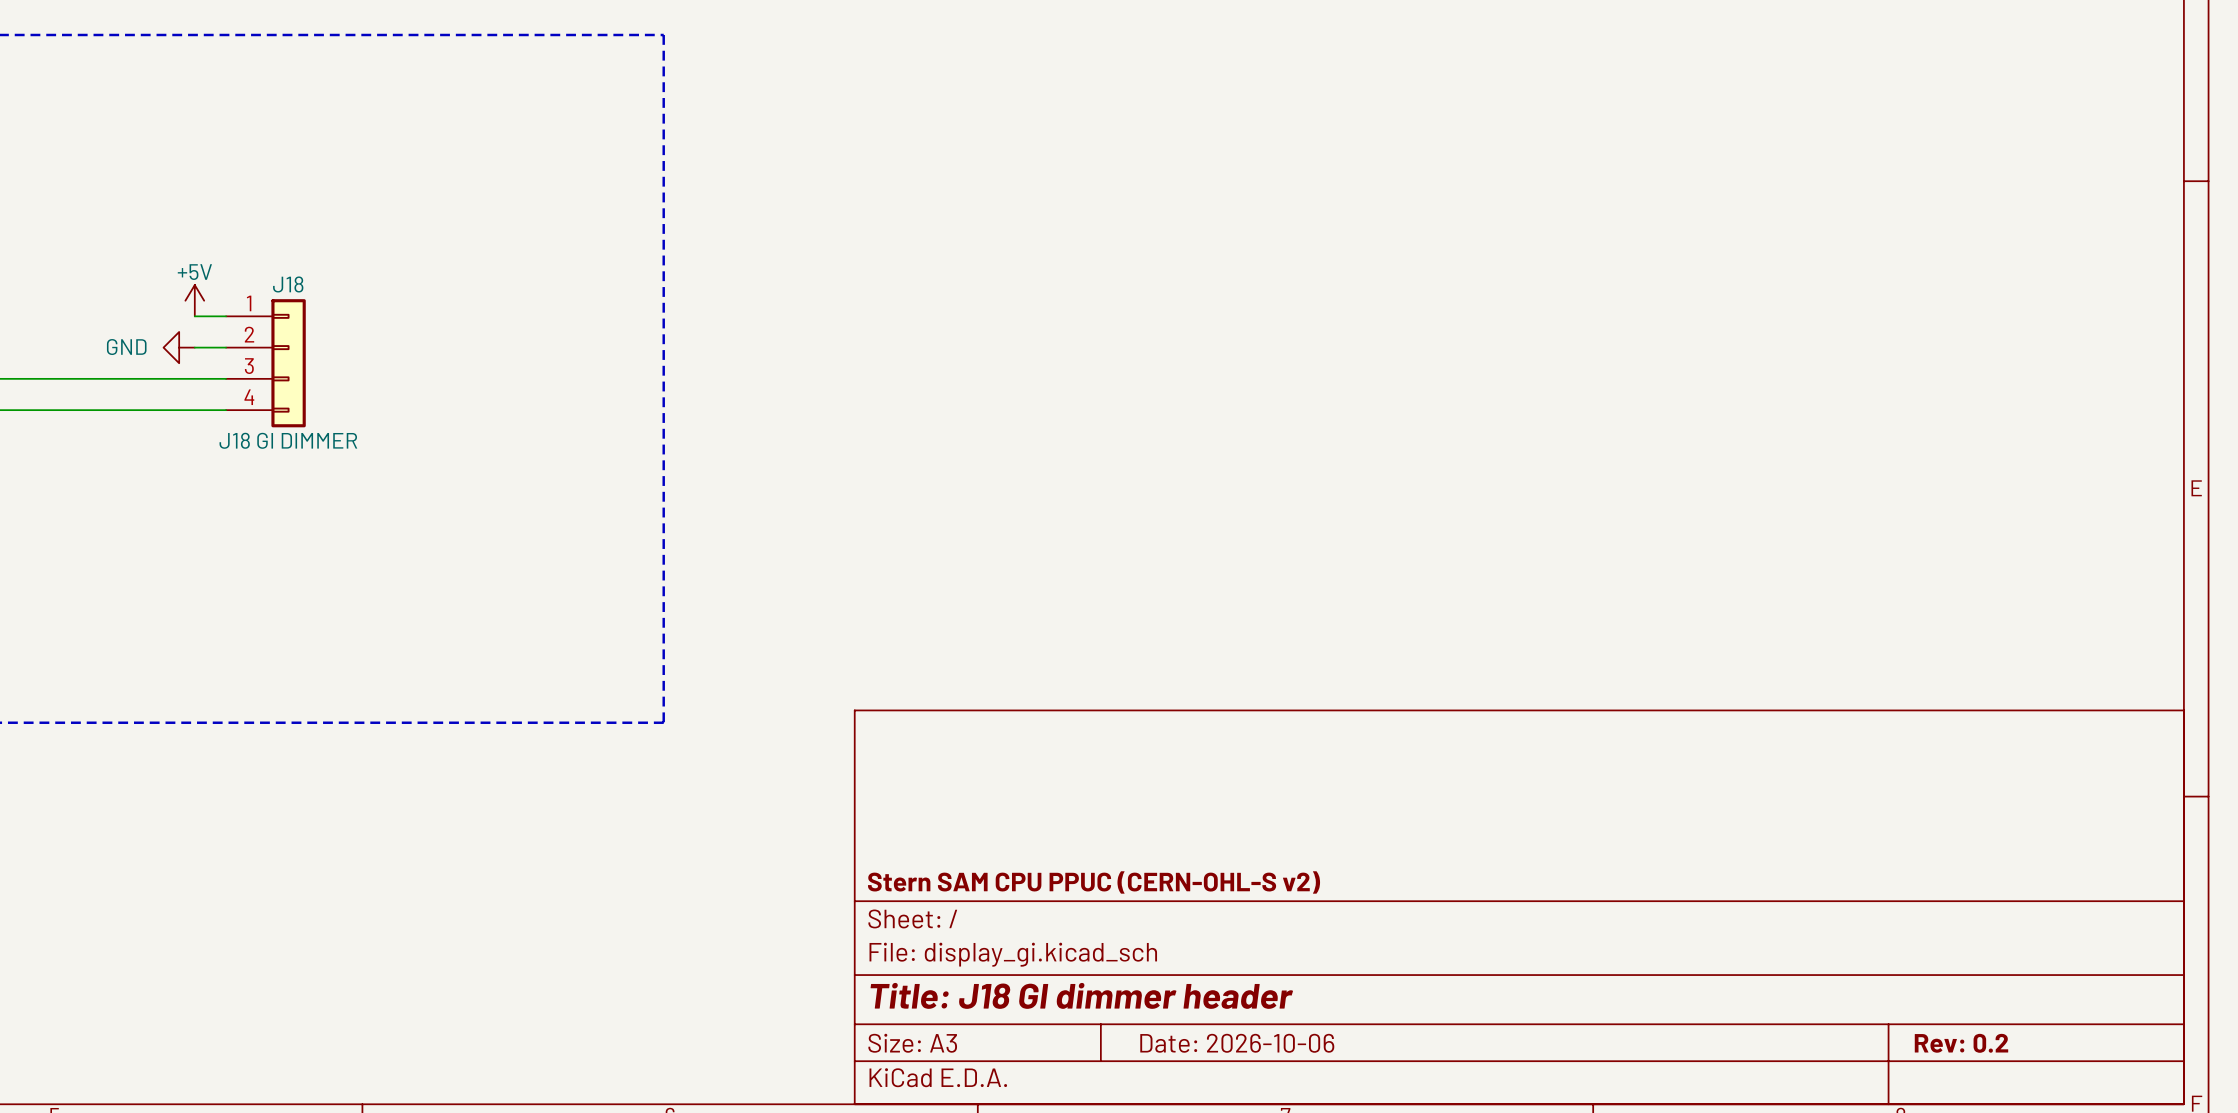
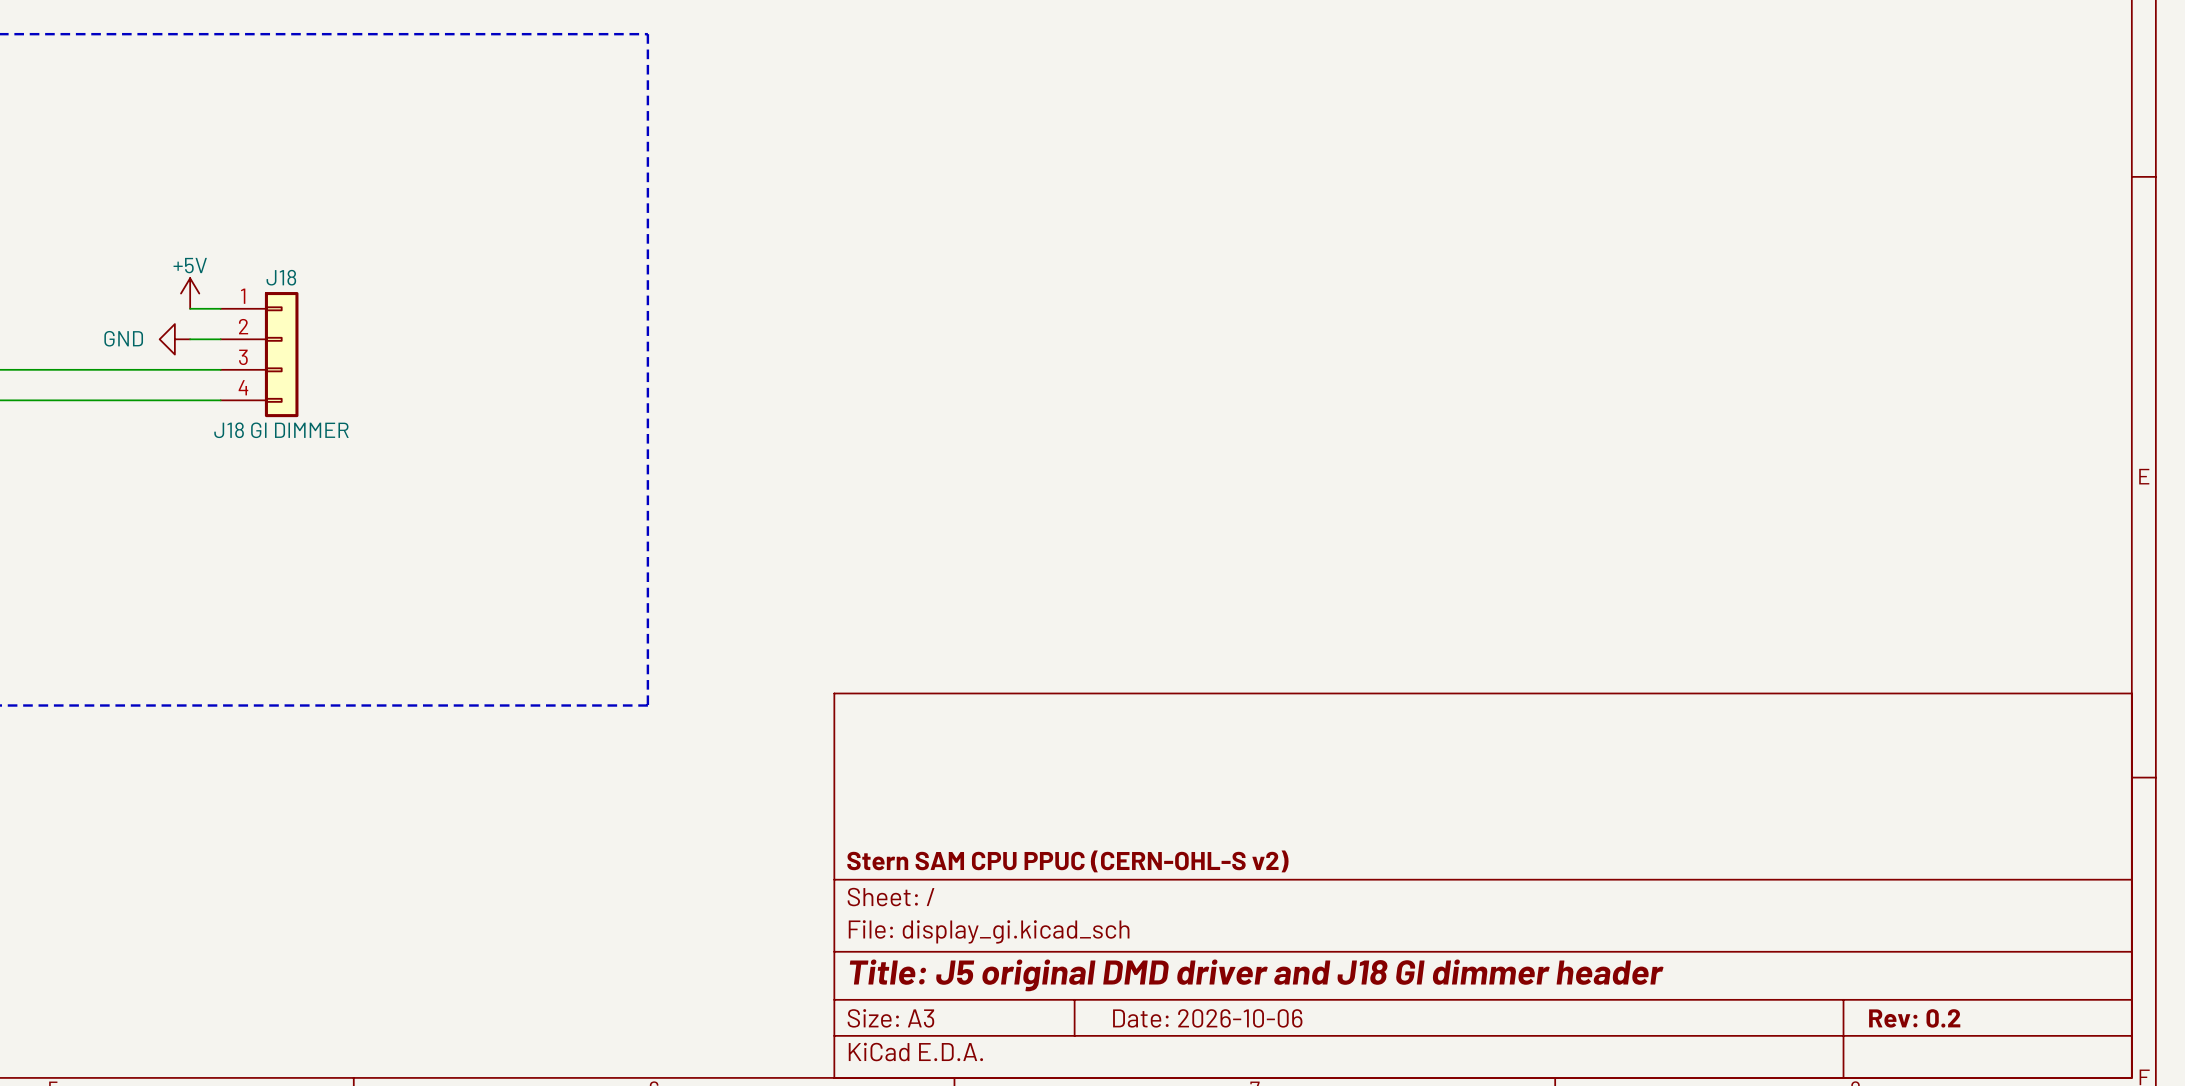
title block: Title: J18 GI dimmer header (1081, 995) -> Title: J5 original DMD driver and J18 GI dimmer header (1256, 975)

